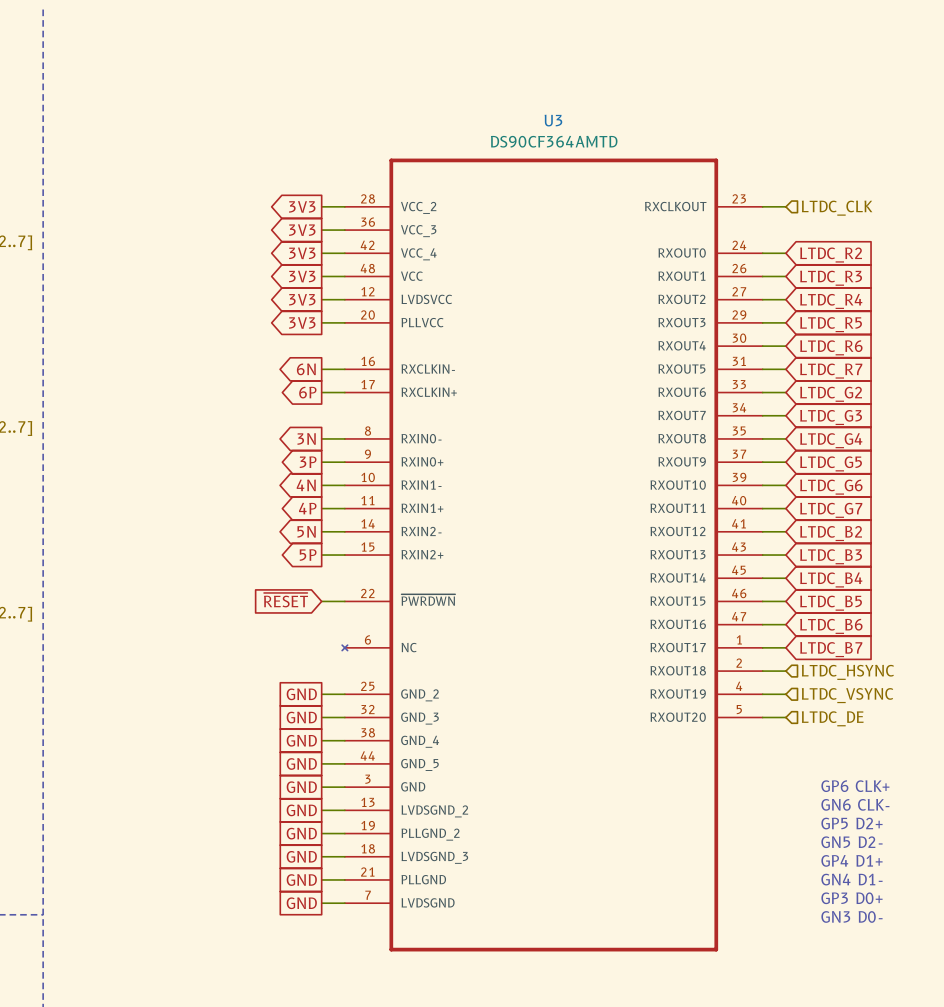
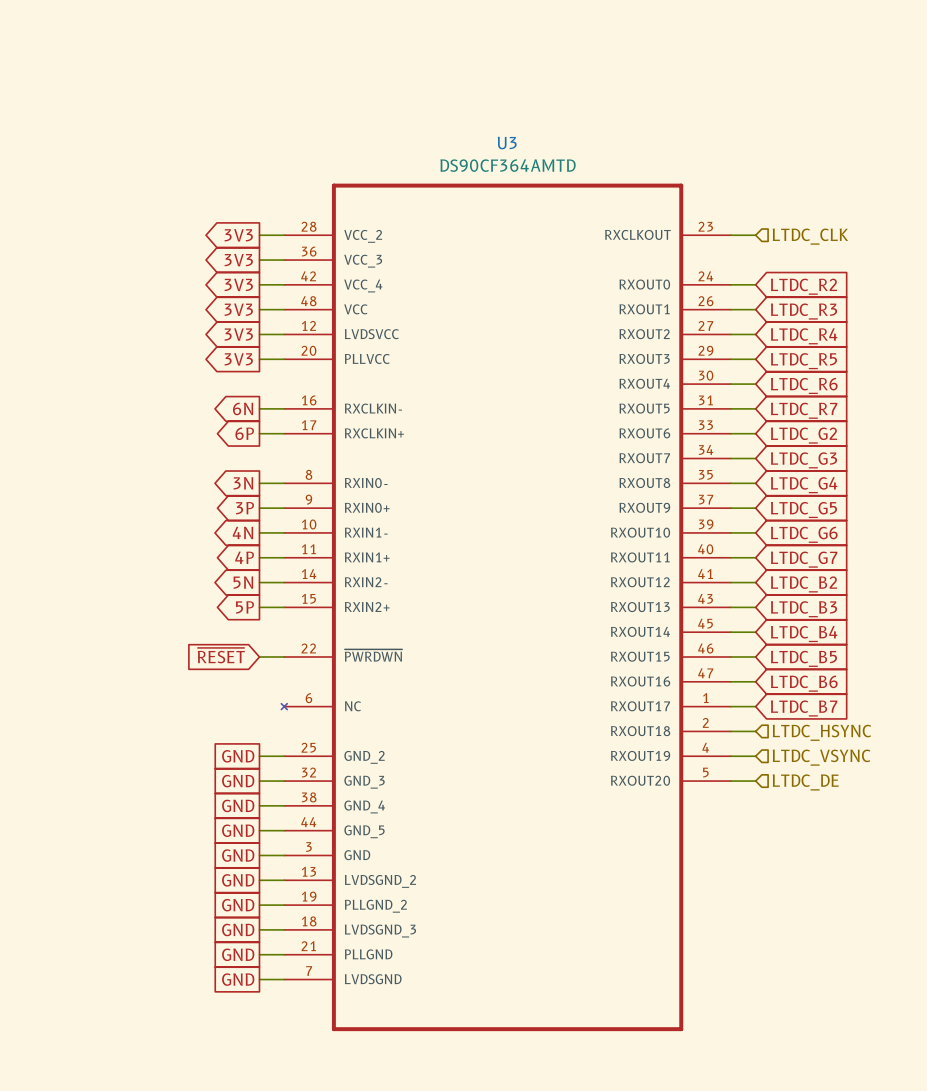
text: GP6 CLK+ (855, 786) -> none
text: GN6 CLK- (855, 804) -> none
text: GP5 D2+ (851, 823) -> none
text: GN5 D2- (851, 842) -> none
text: GP4 D1+ (851, 860) -> none
text: GN4 D1- (851, 879) -> none
text: GP3 D0+ (851, 898) -> none
text: GN3 D0- (851, 916) -> none

